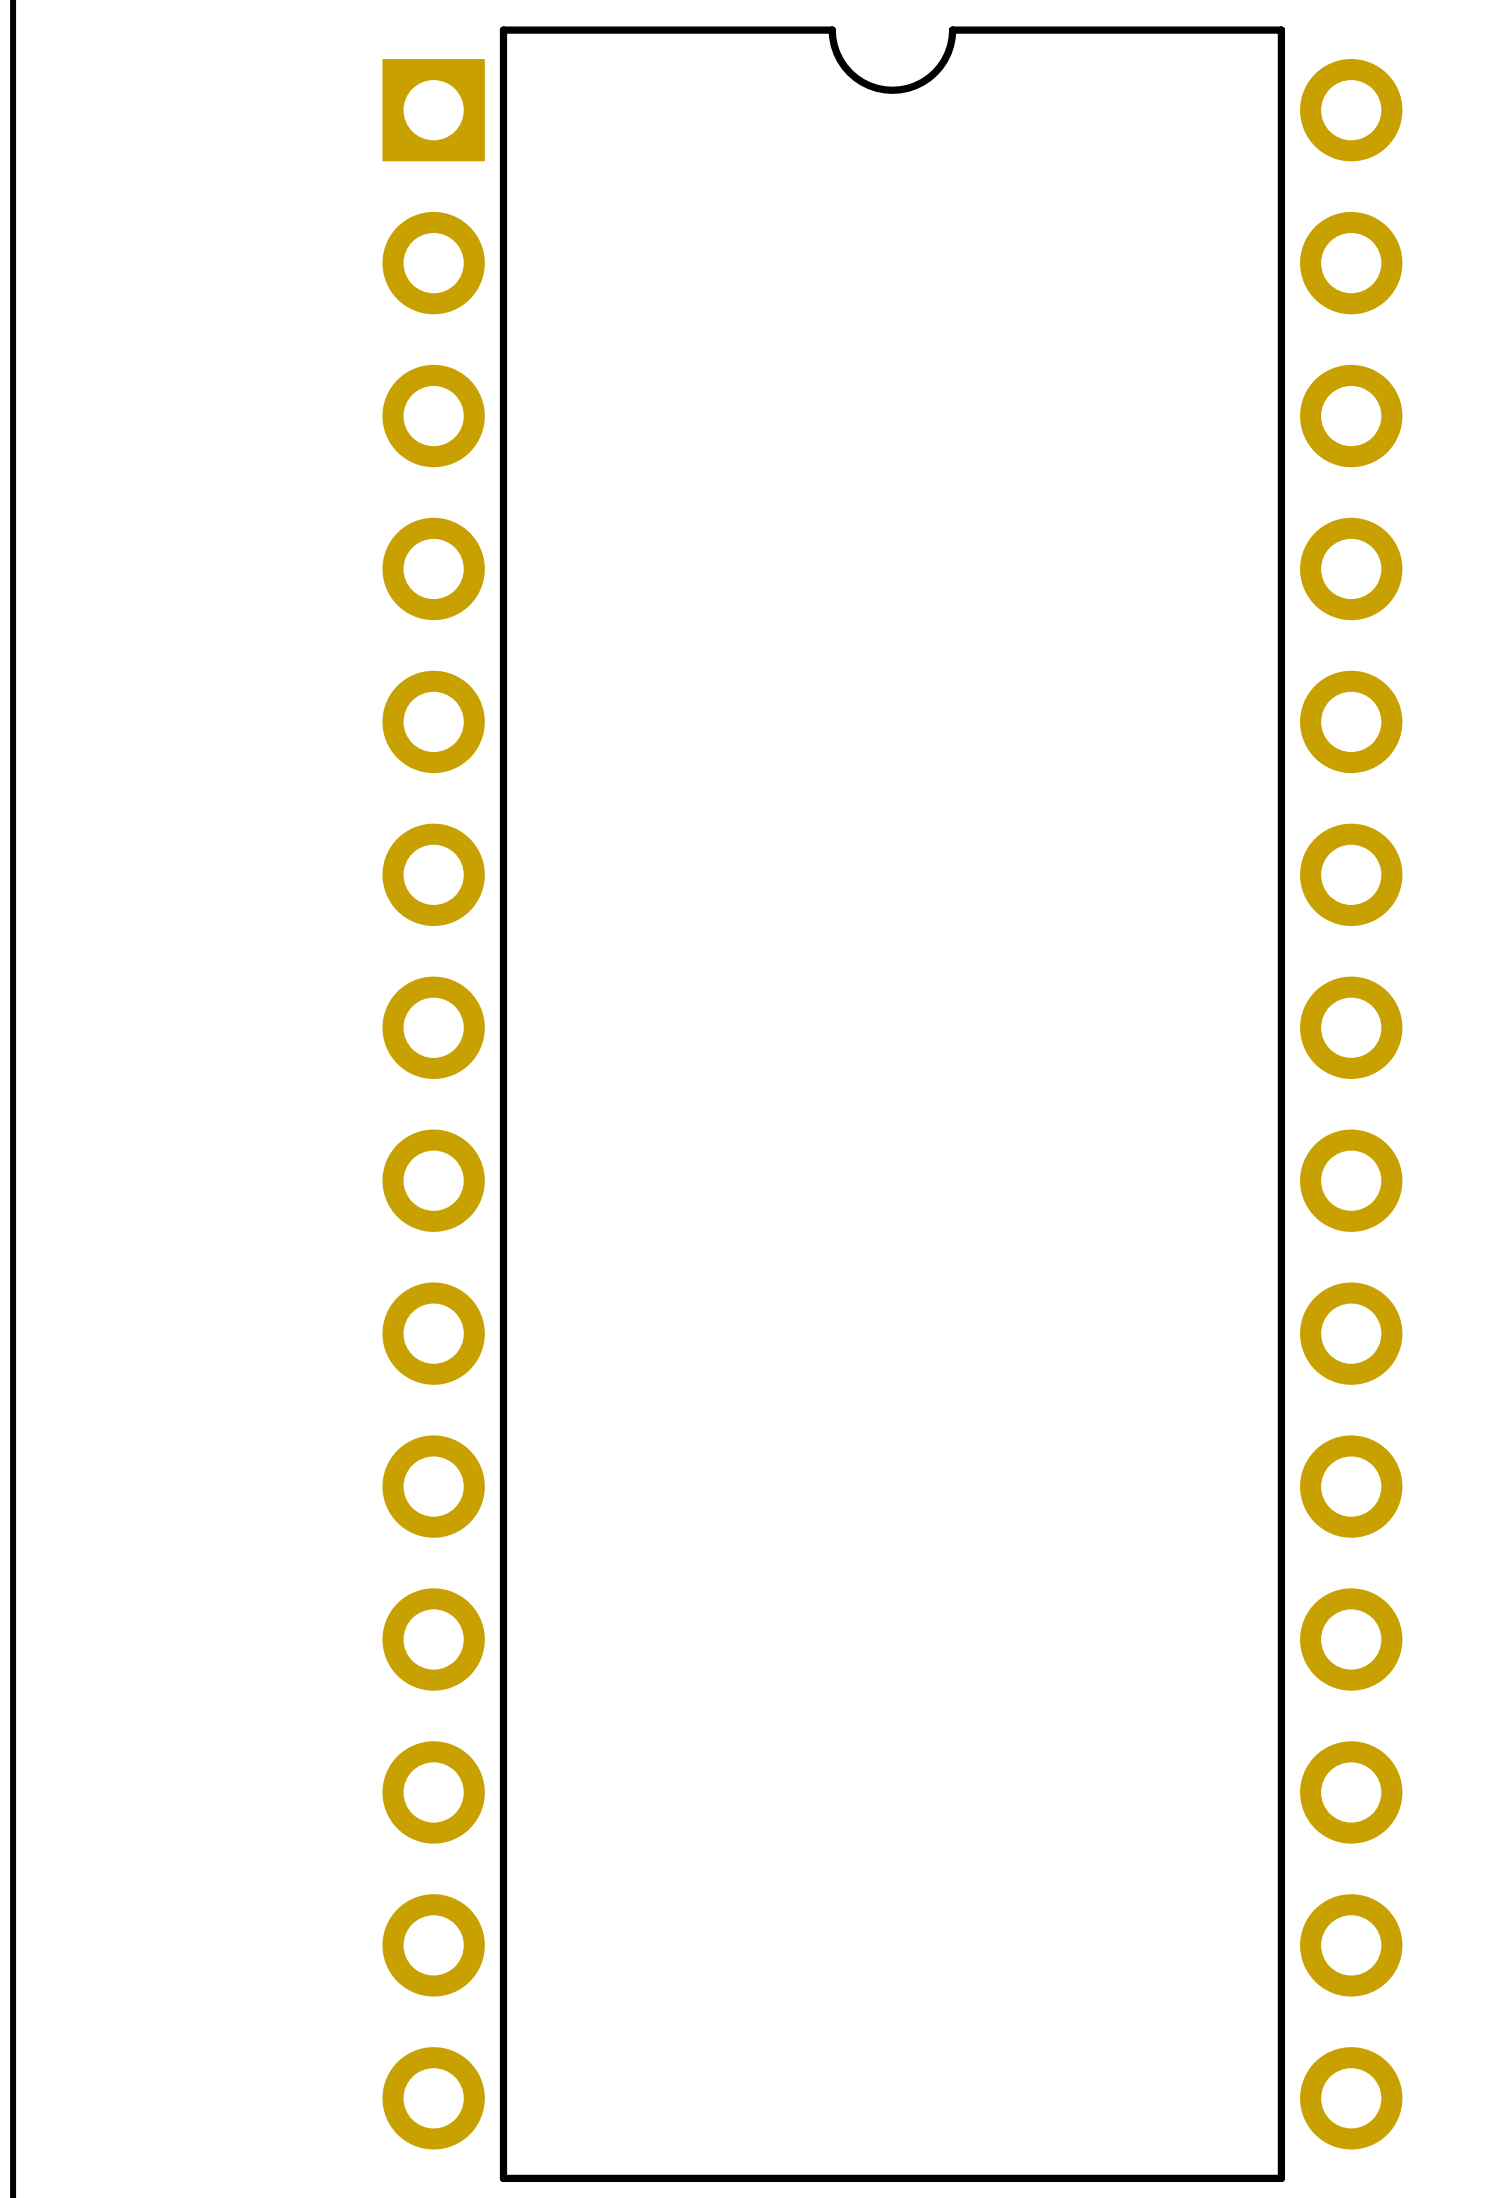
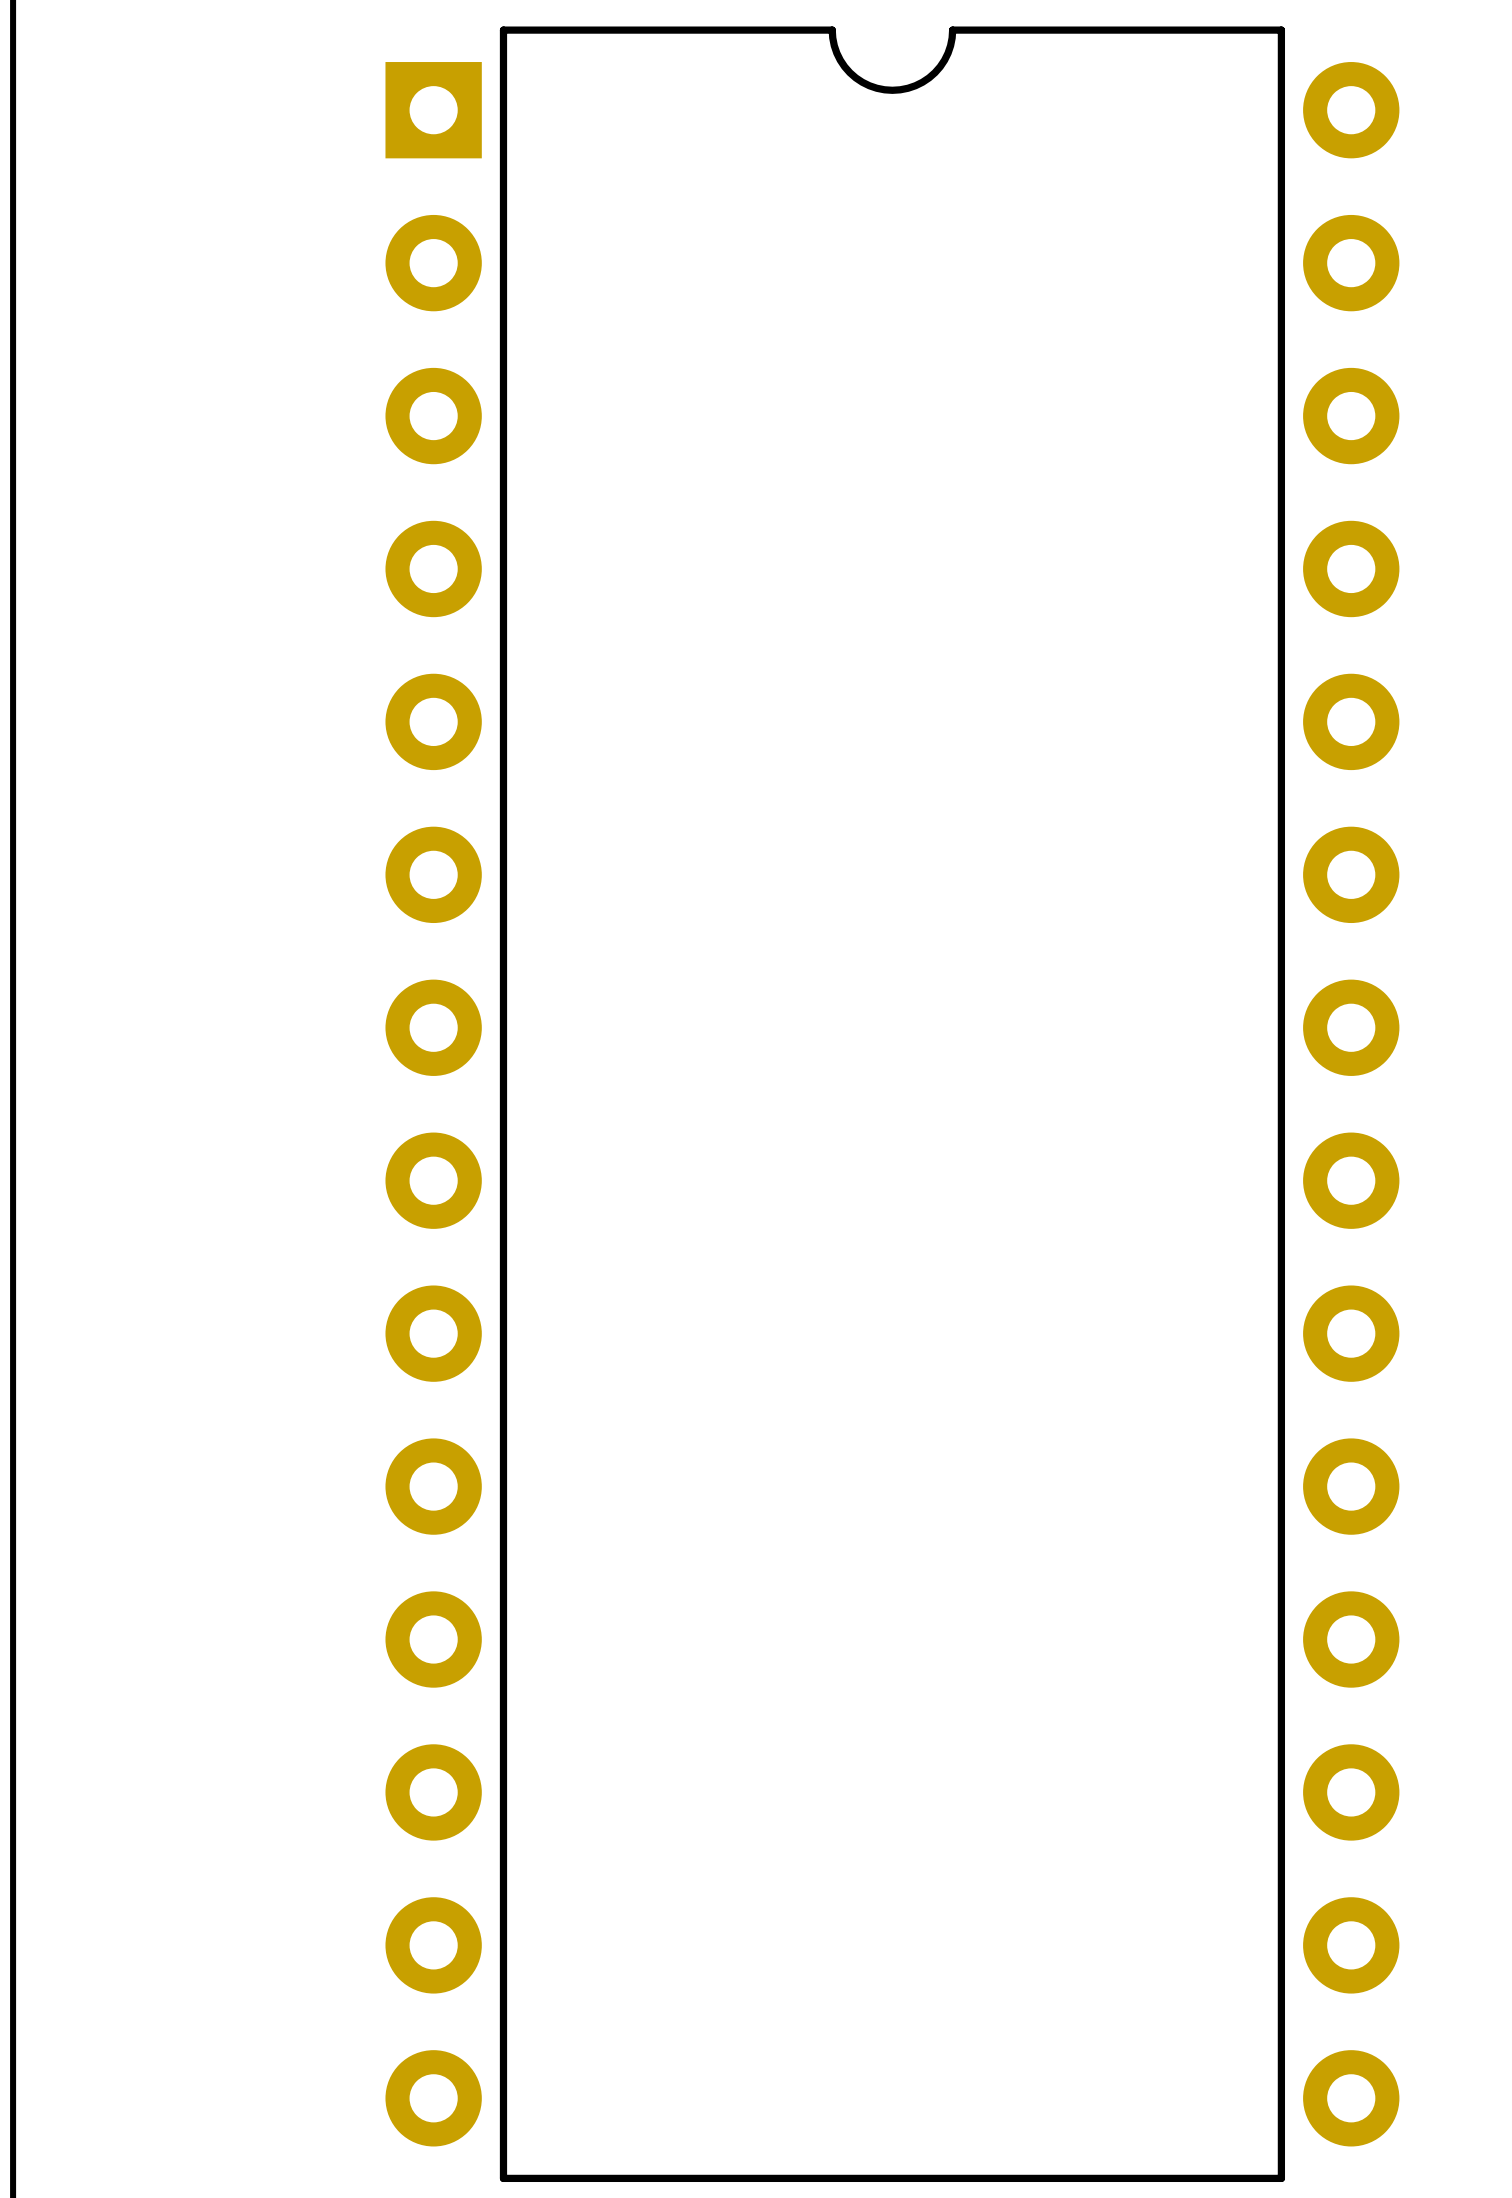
part footprint: [382, 26, 1403, 2183] -> [385, 26, 1400, 2183]

